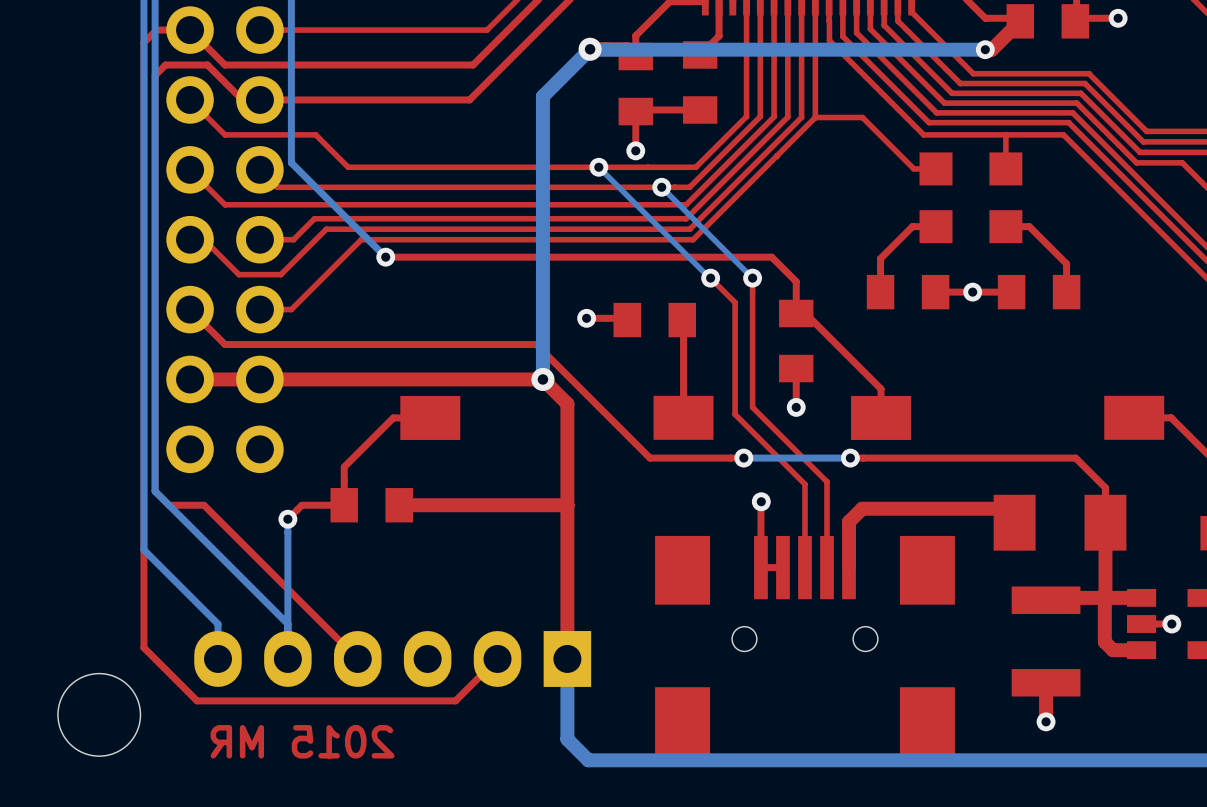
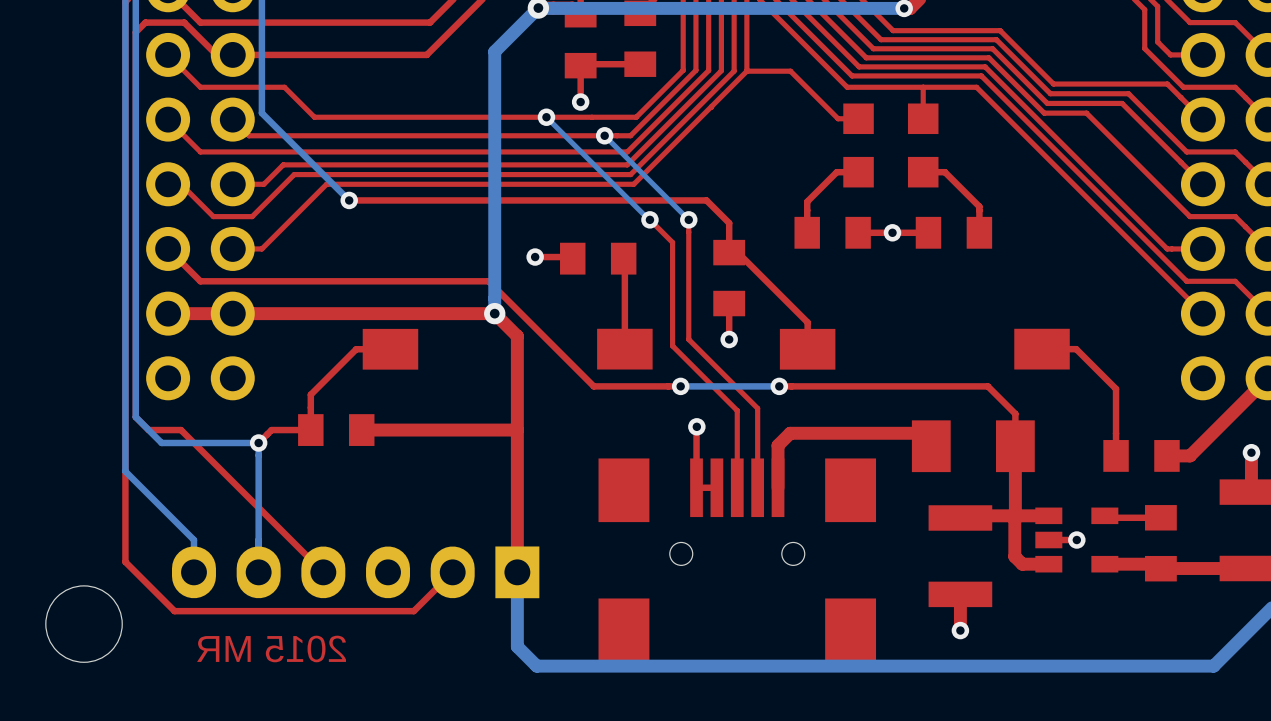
bottom track: (183, 519) (287, 624) -> (161, 442) (258, 442)

